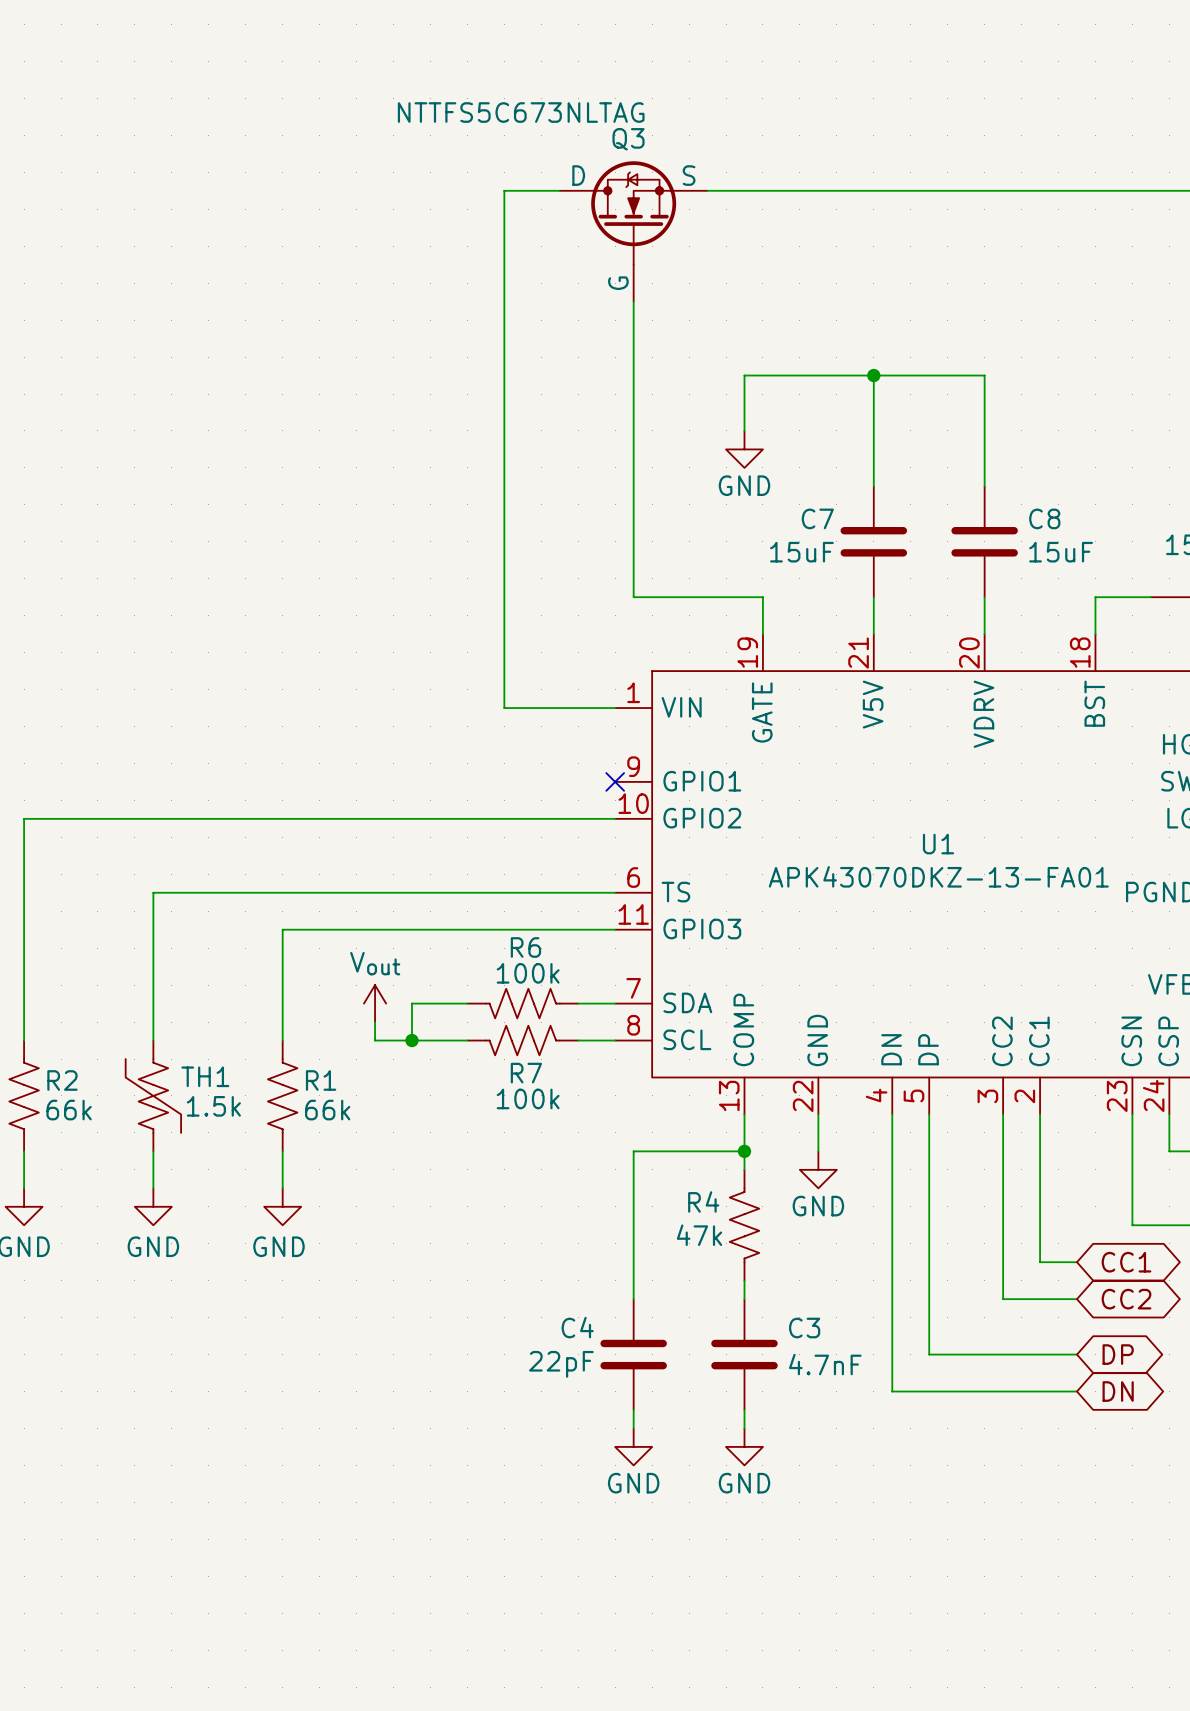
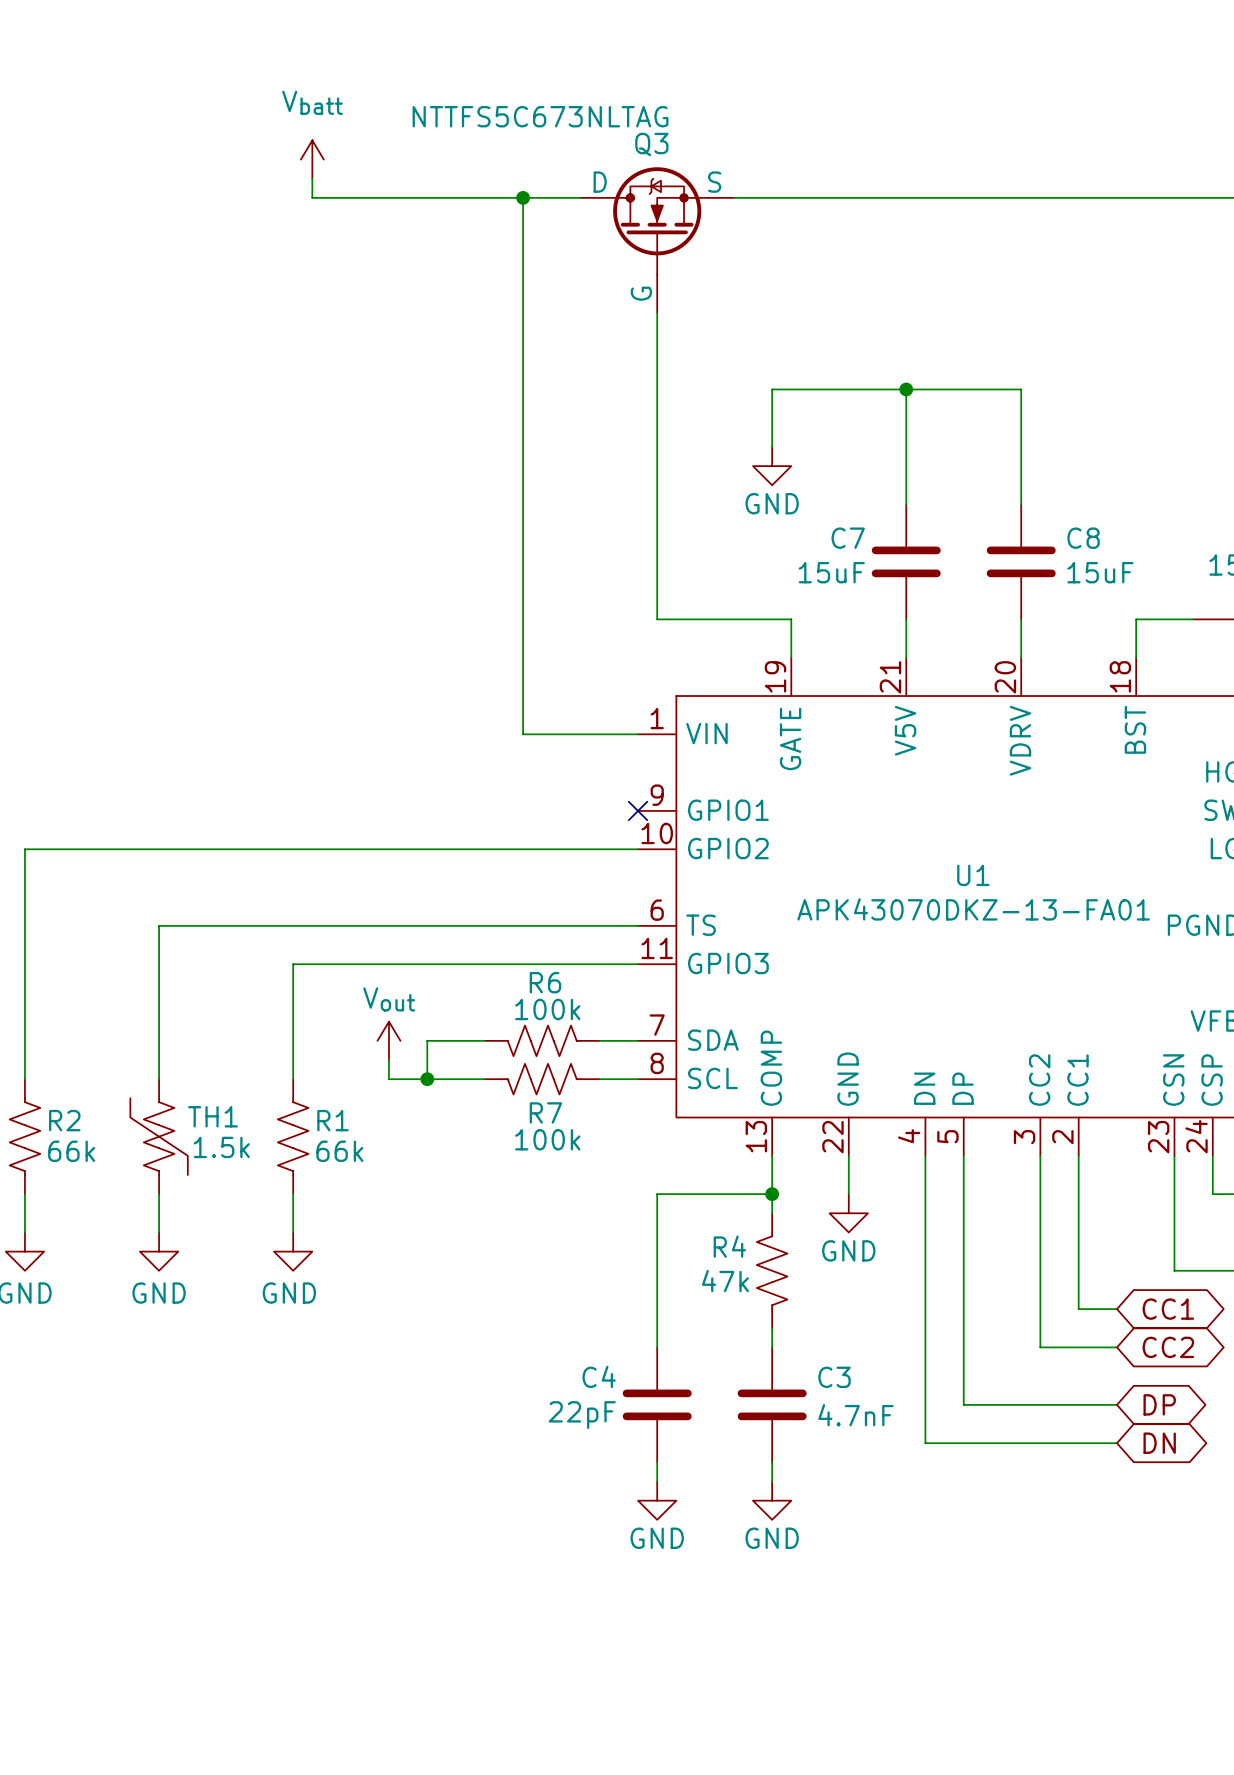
power symbol: none -> Vbatt (312, 159)
wire: none -> (312, 178) (312, 197) (523, 197)
junction: none -> (523, 197)

